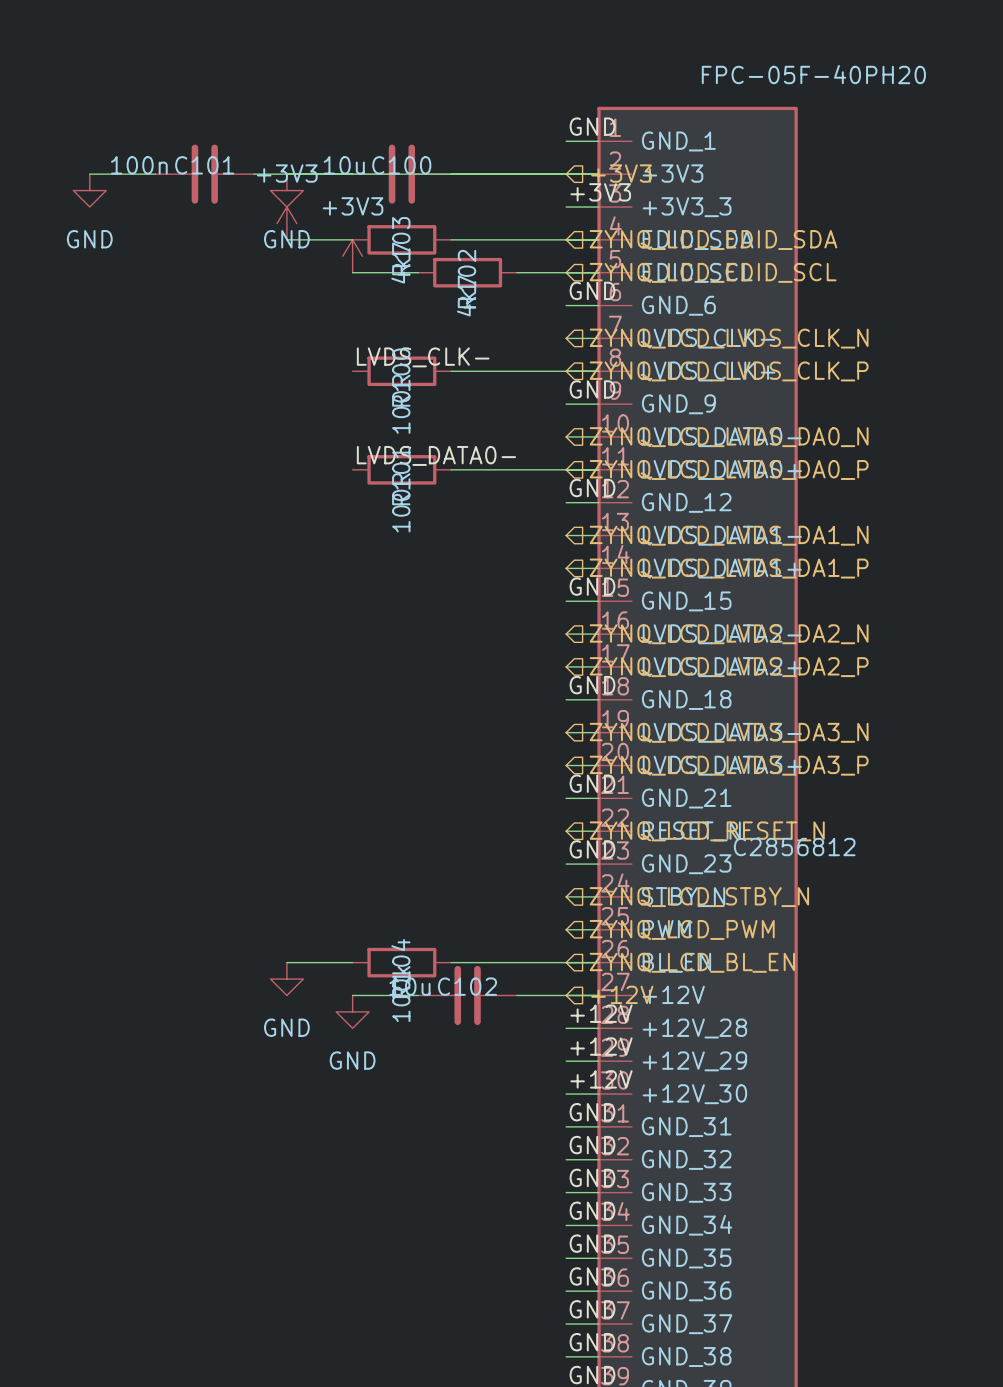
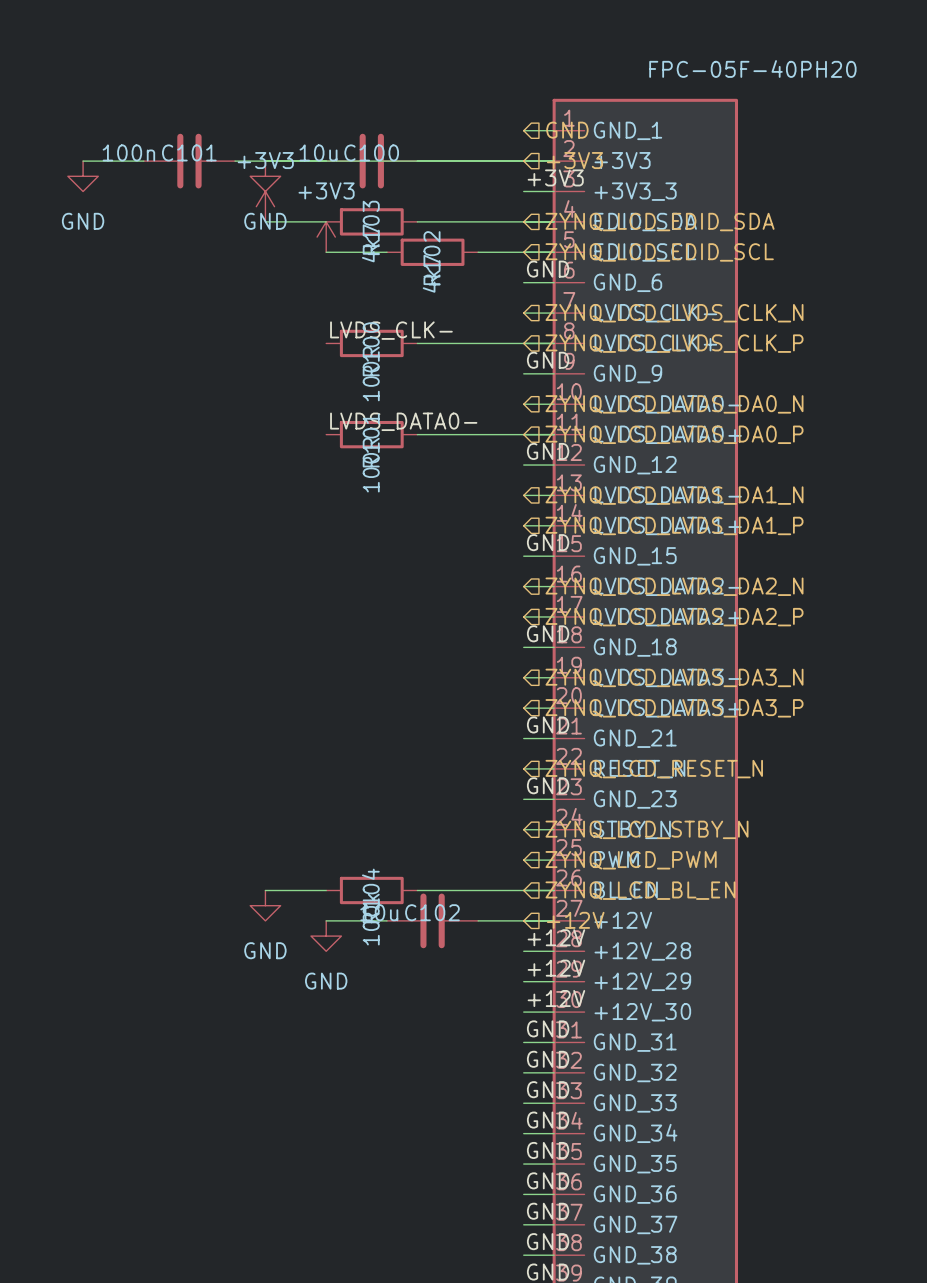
label: GND (592, 126) -> none
hierarchical label: none -> GND (567, 130)
part text: C2856812 (794, 847) -> none

